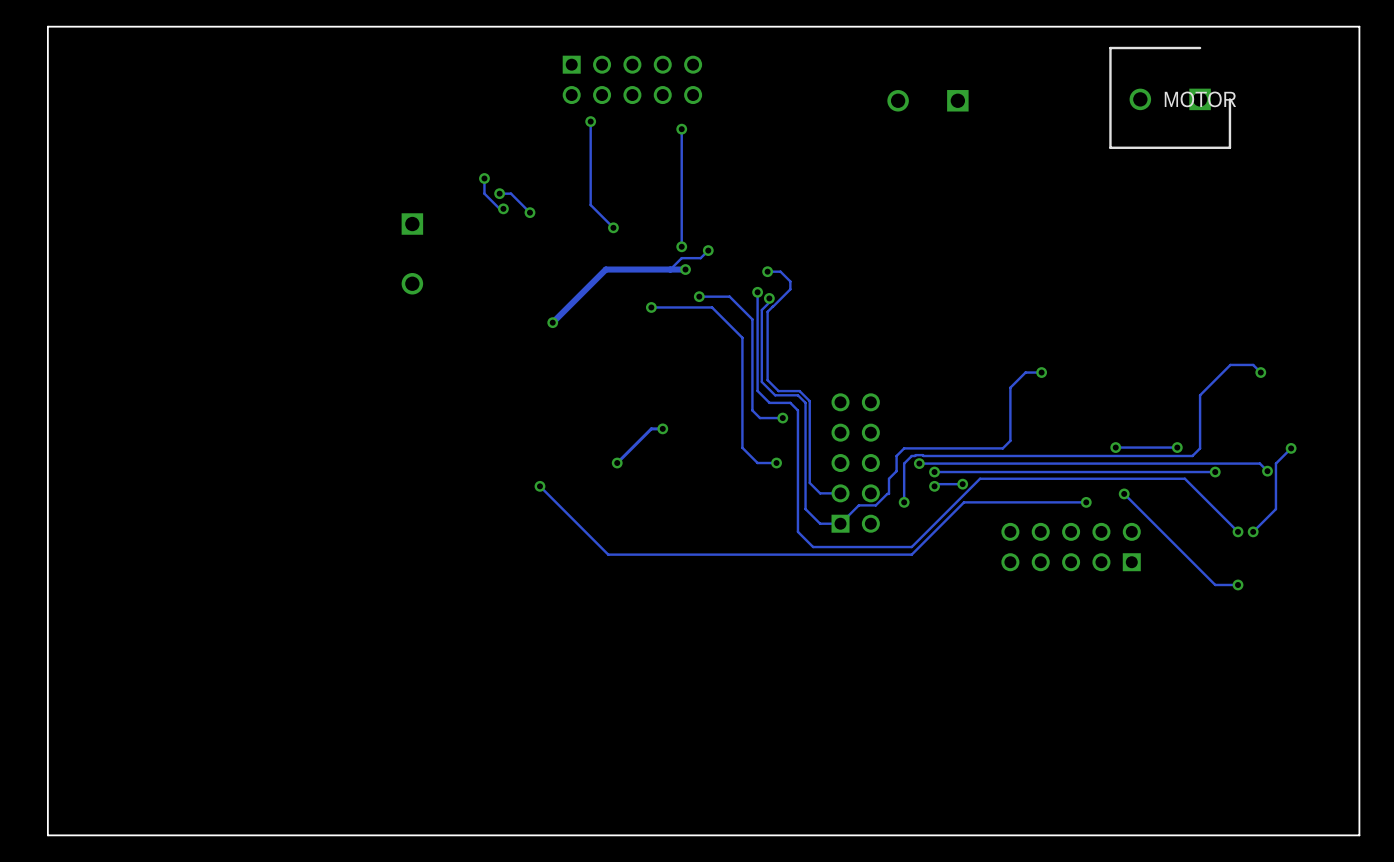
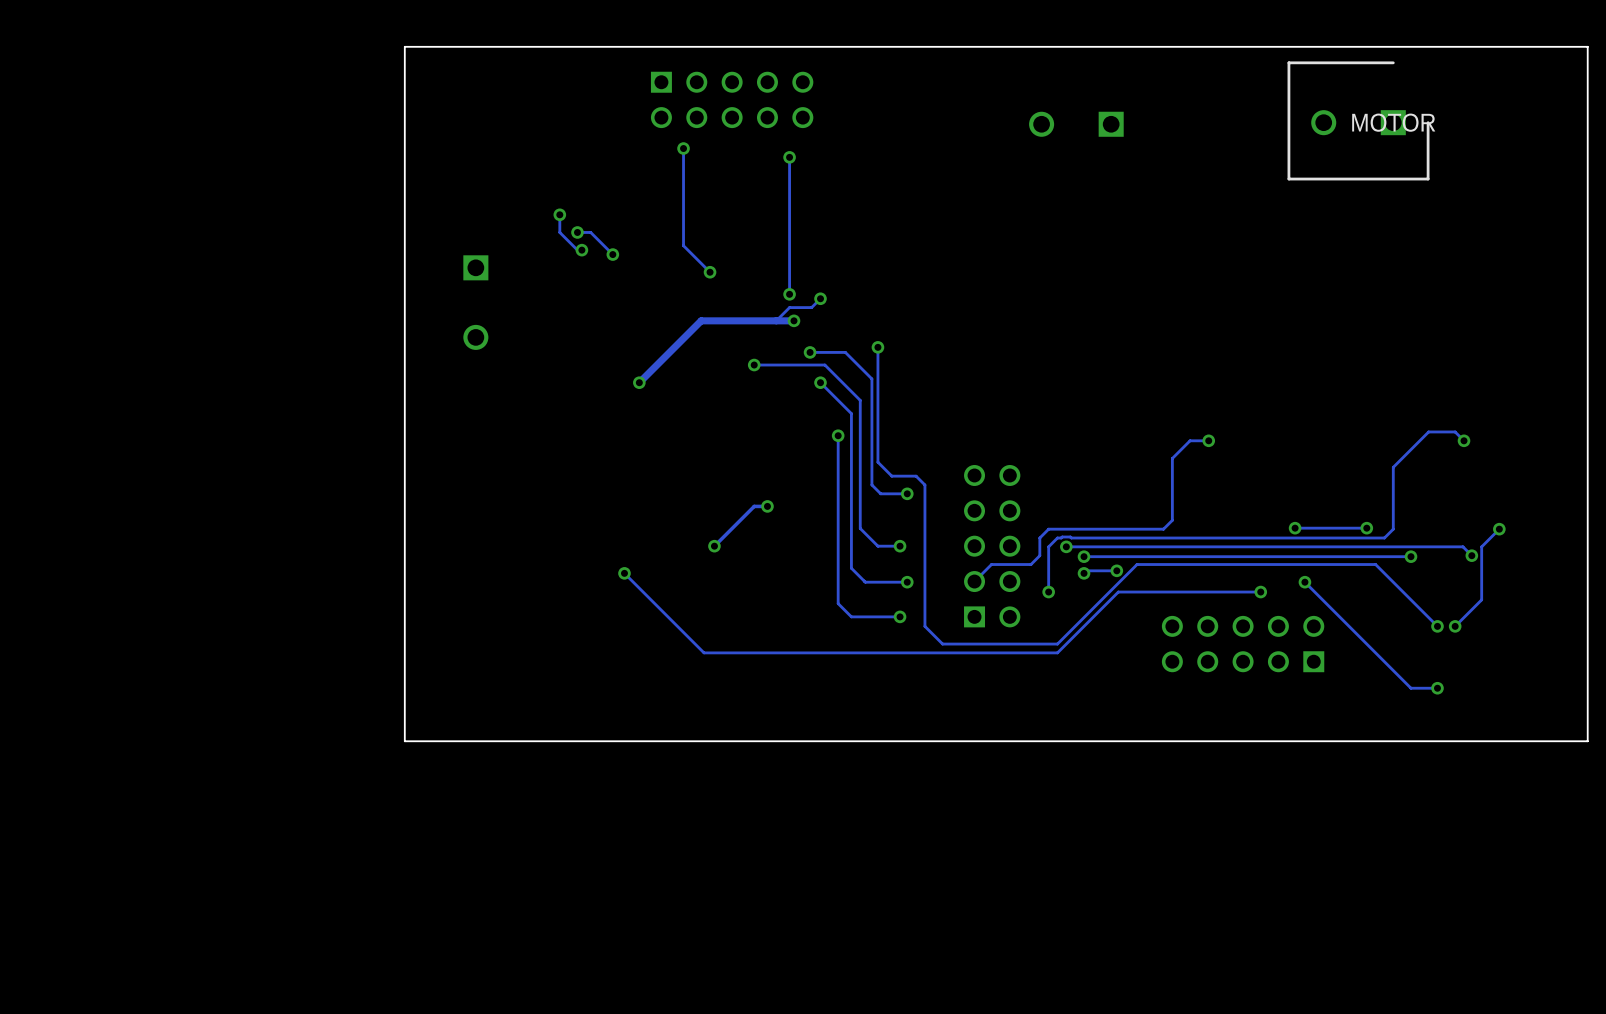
board edge: (1359, 26) (47, 26) (47, 835) (1359, 835) (1359, 26) -> (1587, 46) (1587, 741) (404, 741) (404, 46) (1587, 46)
track: (767, 271) (780, 271) (790, 281) (790, 289) (767, 311) (767, 380) (778, 391) (799, 391) (809, 401) (809, 482) (820, 493) (840, 493) -> none
via: (767, 271) -> none
track: (769, 298) (769, 302) (761, 310) (761, 381) (775, 395) (797, 395) (805, 402) (805, 509) (820, 523) (840, 523) (858, 505) (875, 505) (889, 493) (889, 478) -> (974, 581) (991, 564) (1030, 564)
via: (769, 298) -> none
track: none -> (820, 382) (851, 413) (851, 568) (865, 582) (907, 582)
via: none -> (820, 382)
track: none -> (838, 435) (838, 603) (851, 616) (900, 616)
via: none -> (838, 435)
via: none -> (907, 582)
via: none -> (900, 616)

